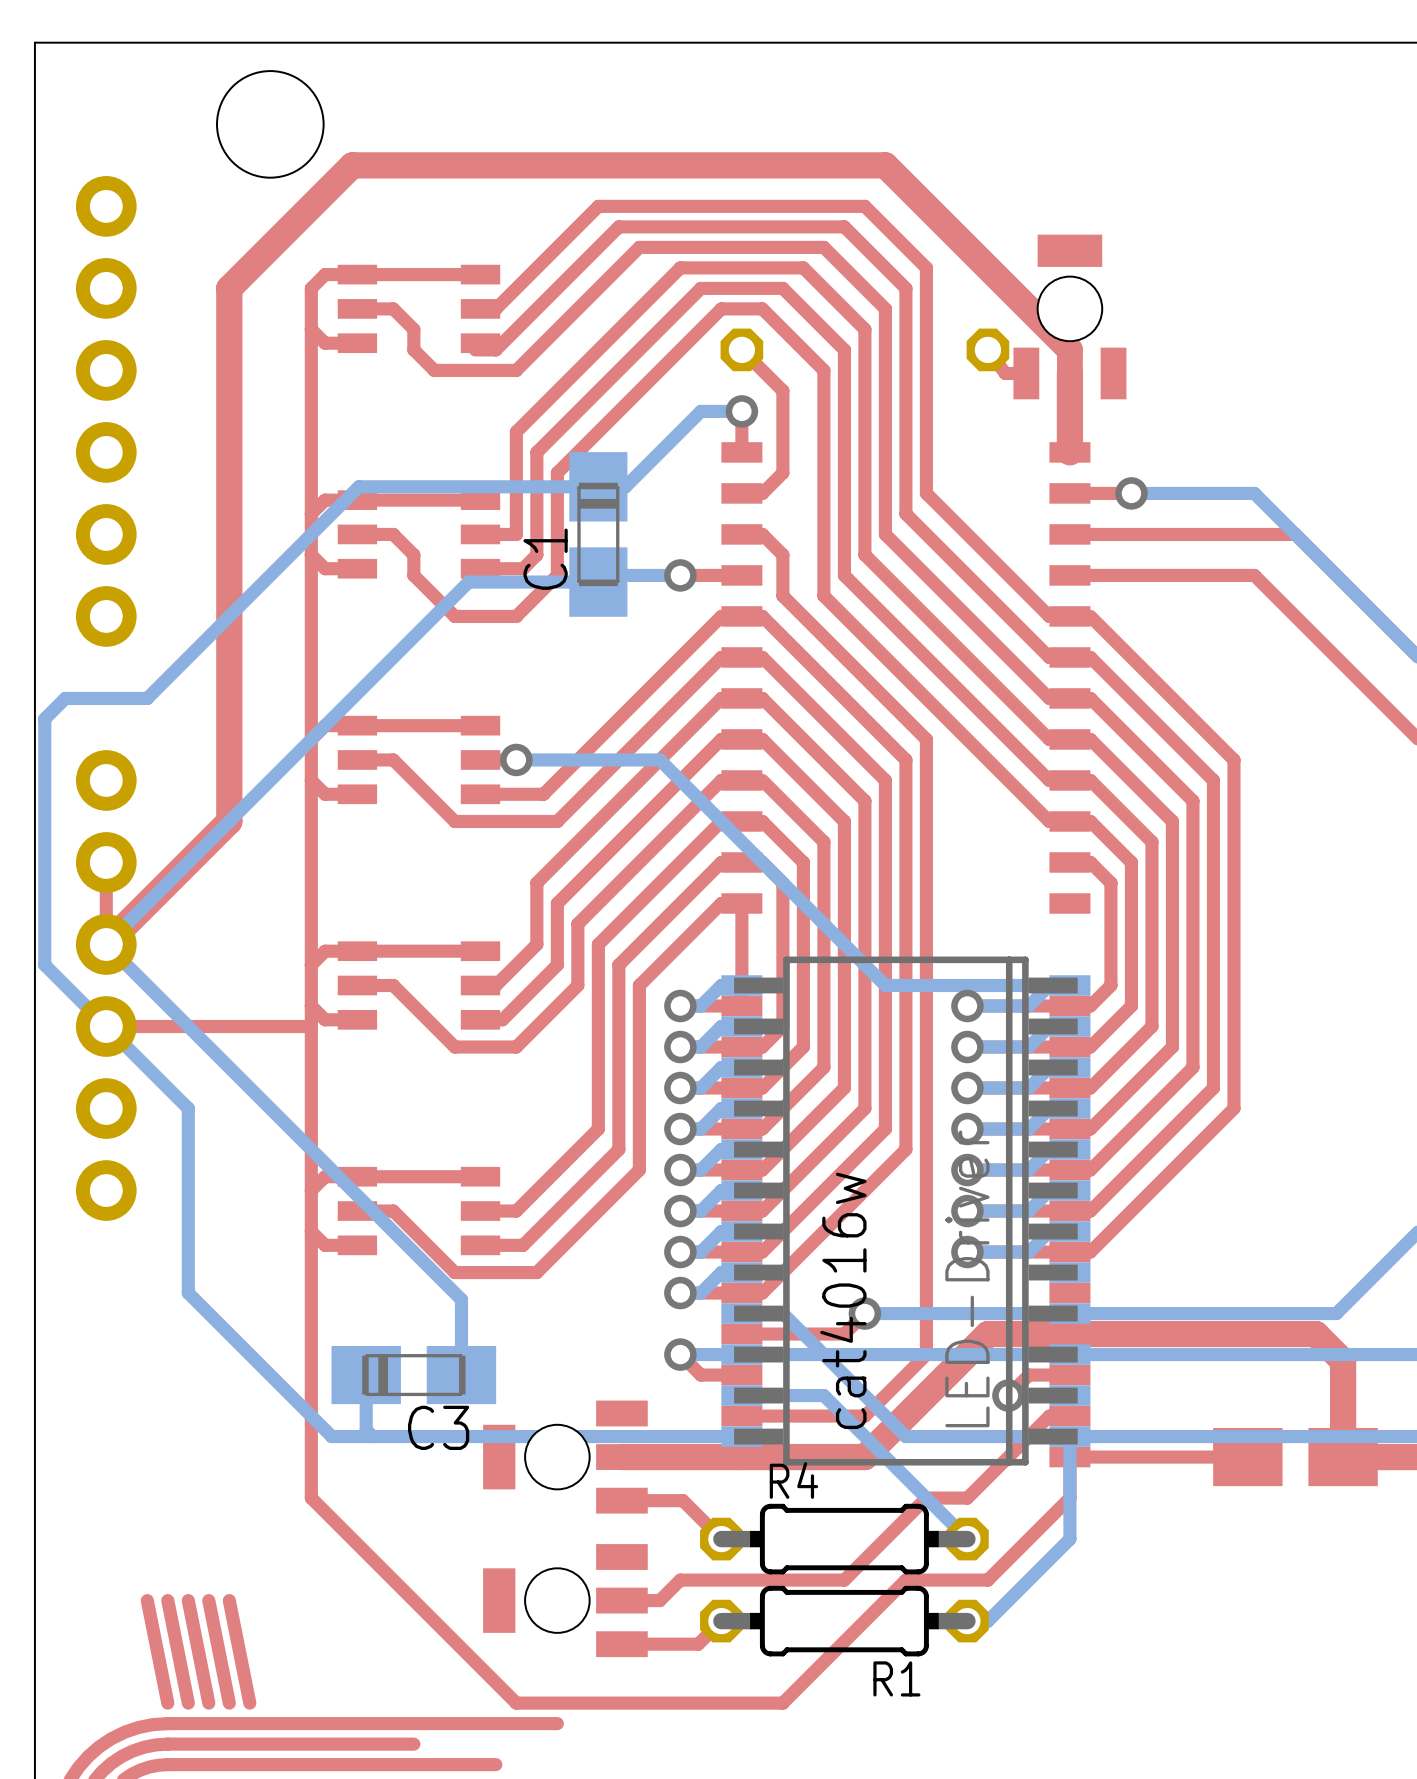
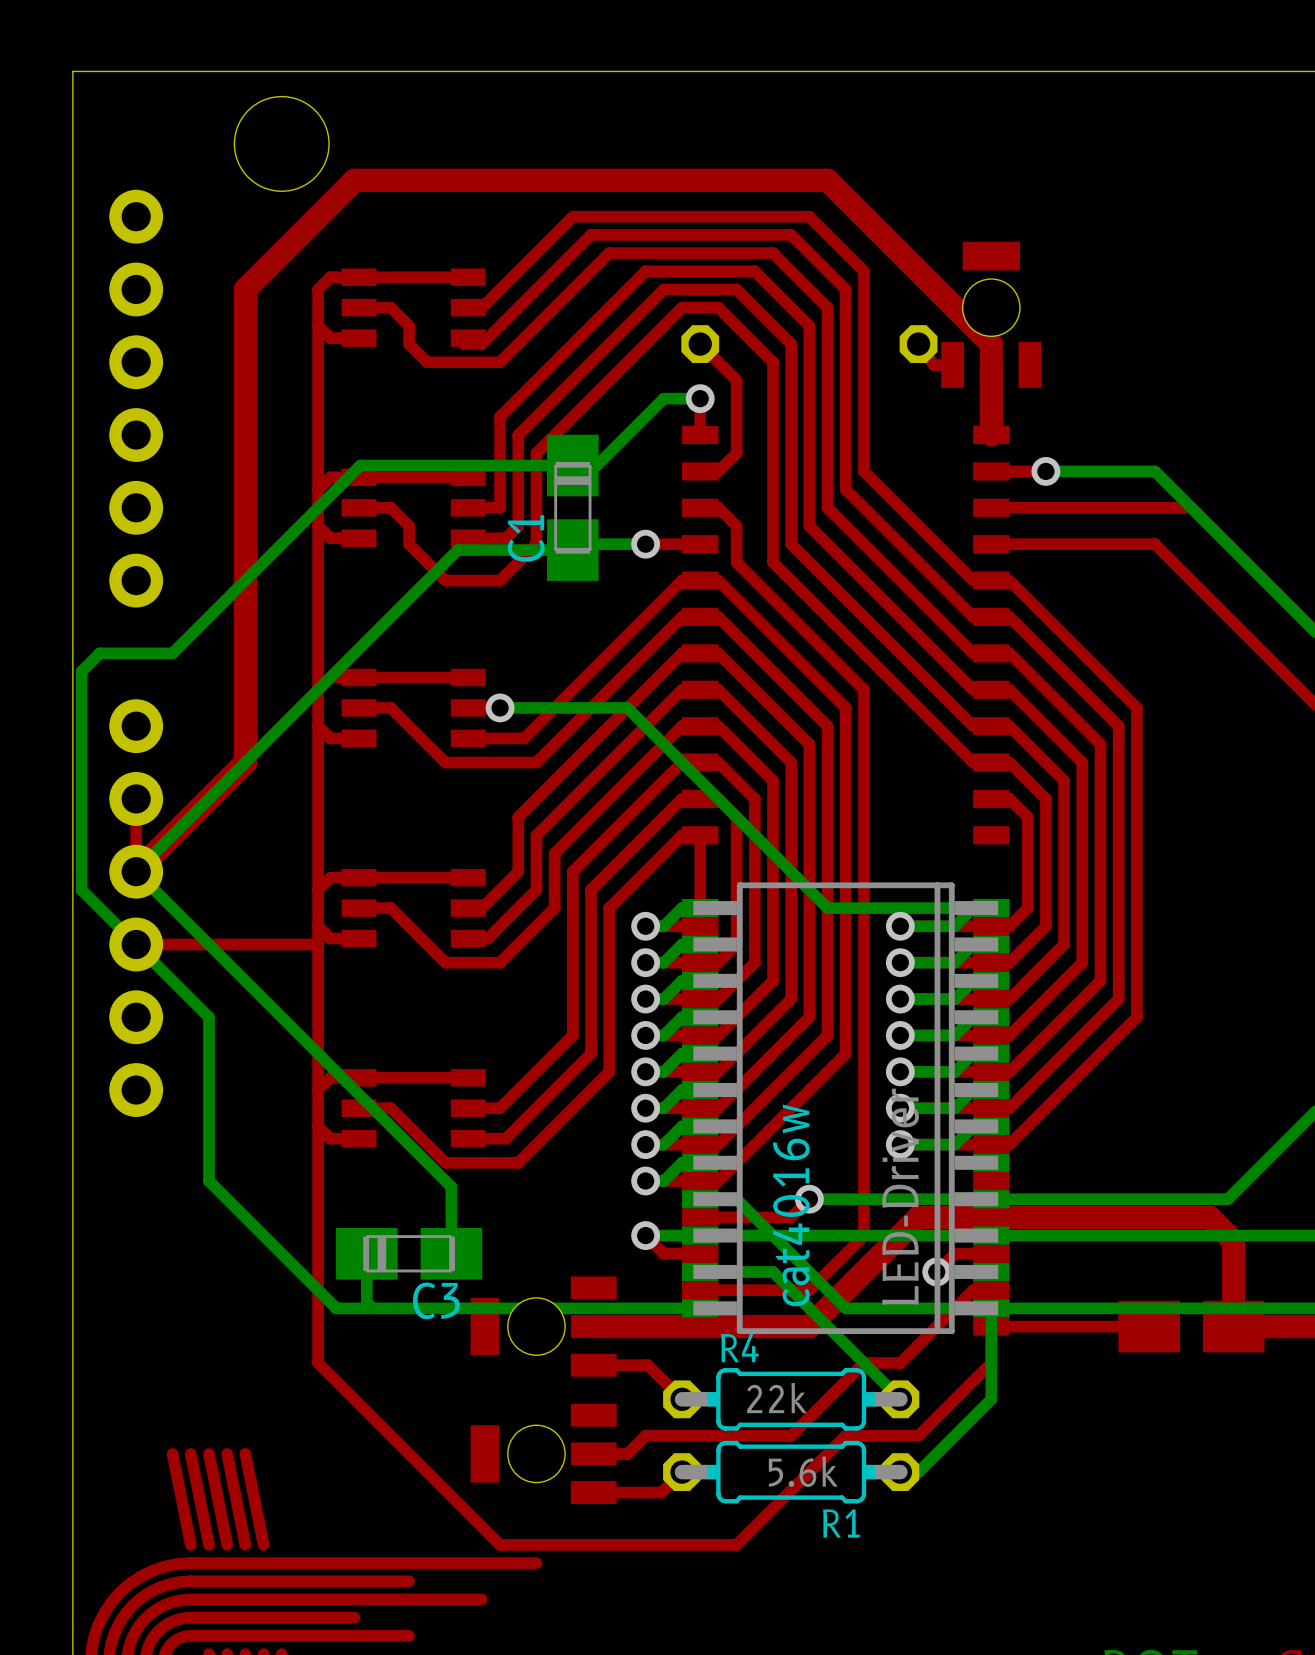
R4 value: none -> 22k (776, 1398)
R1 value: none -> 5.6k (803, 1471)

